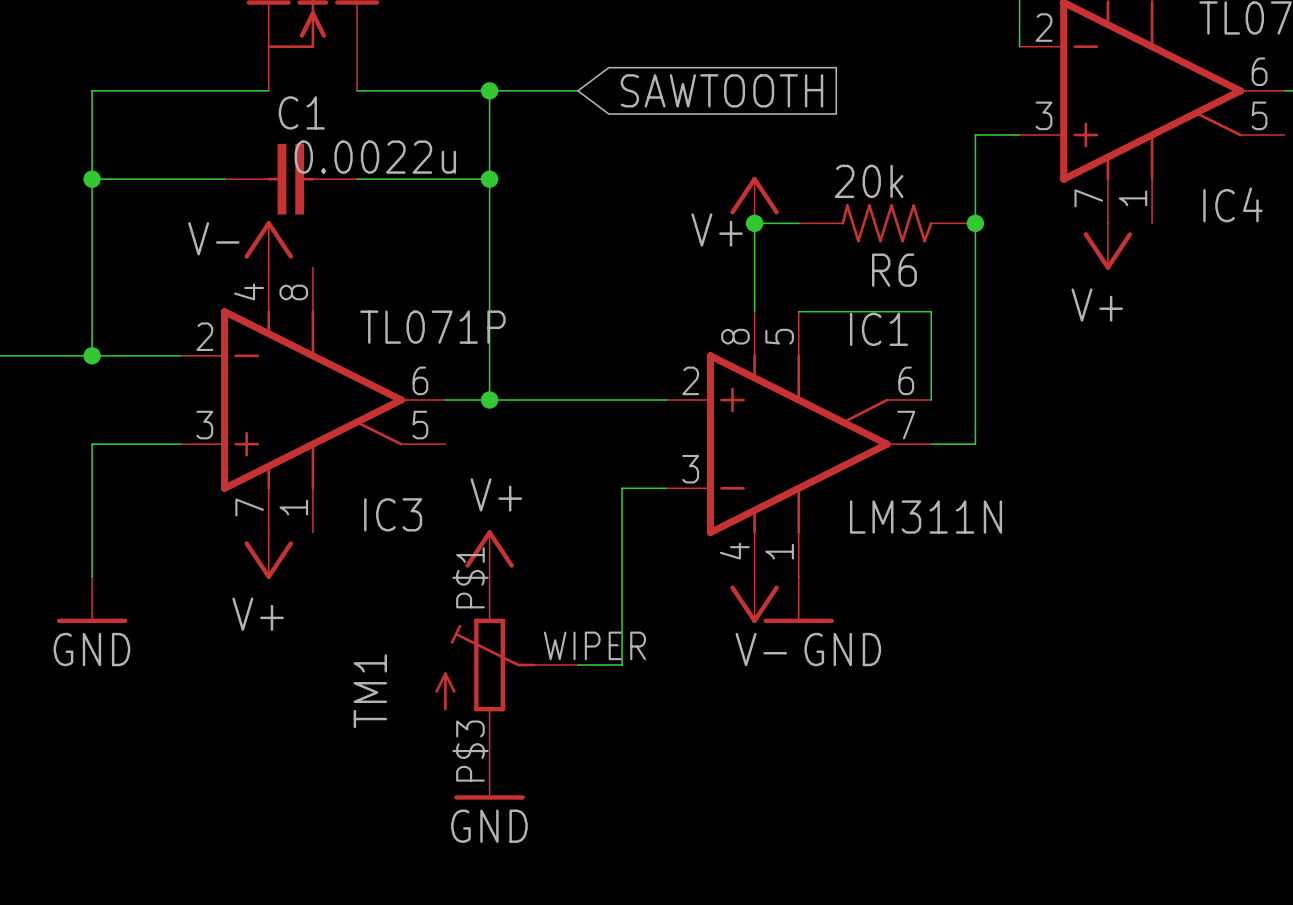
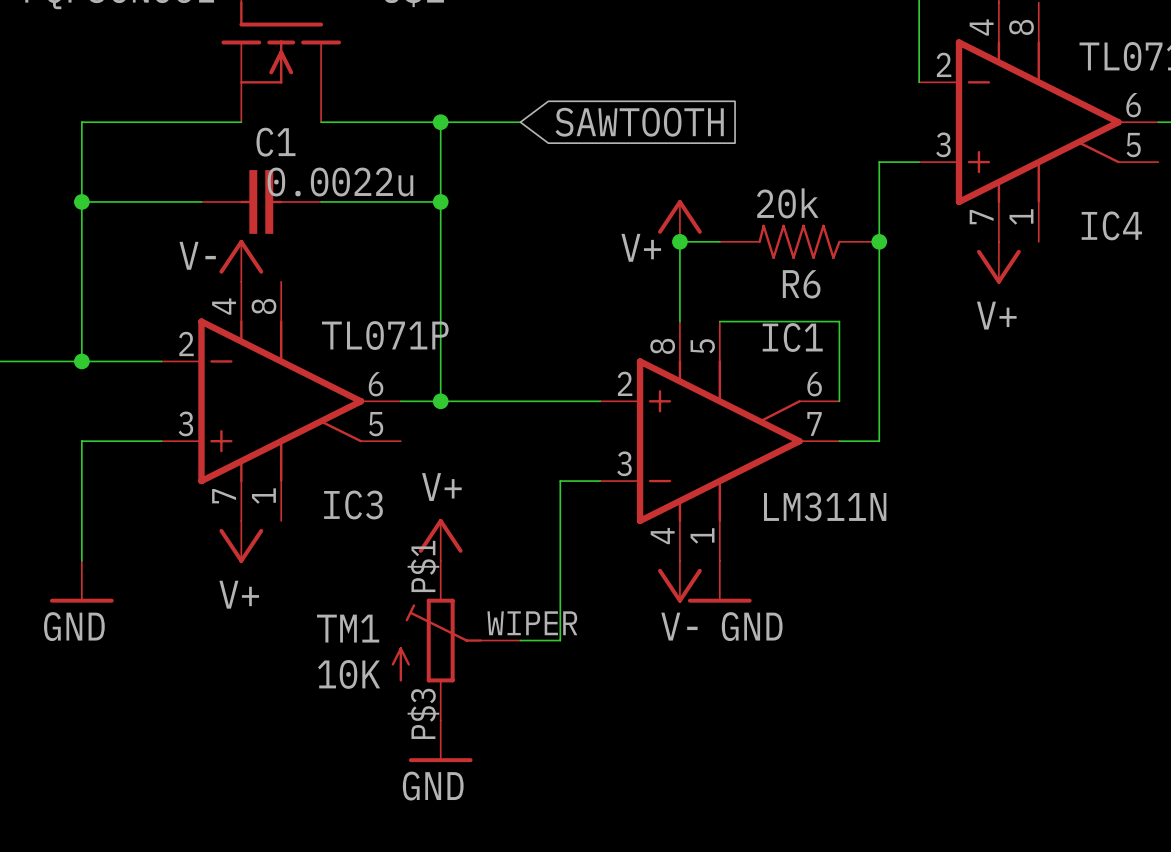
TM1 name rotation: 0° (370, 691) -> 90° clockwise (348, 628)
TM1 value: none -> 10K (349, 674)

